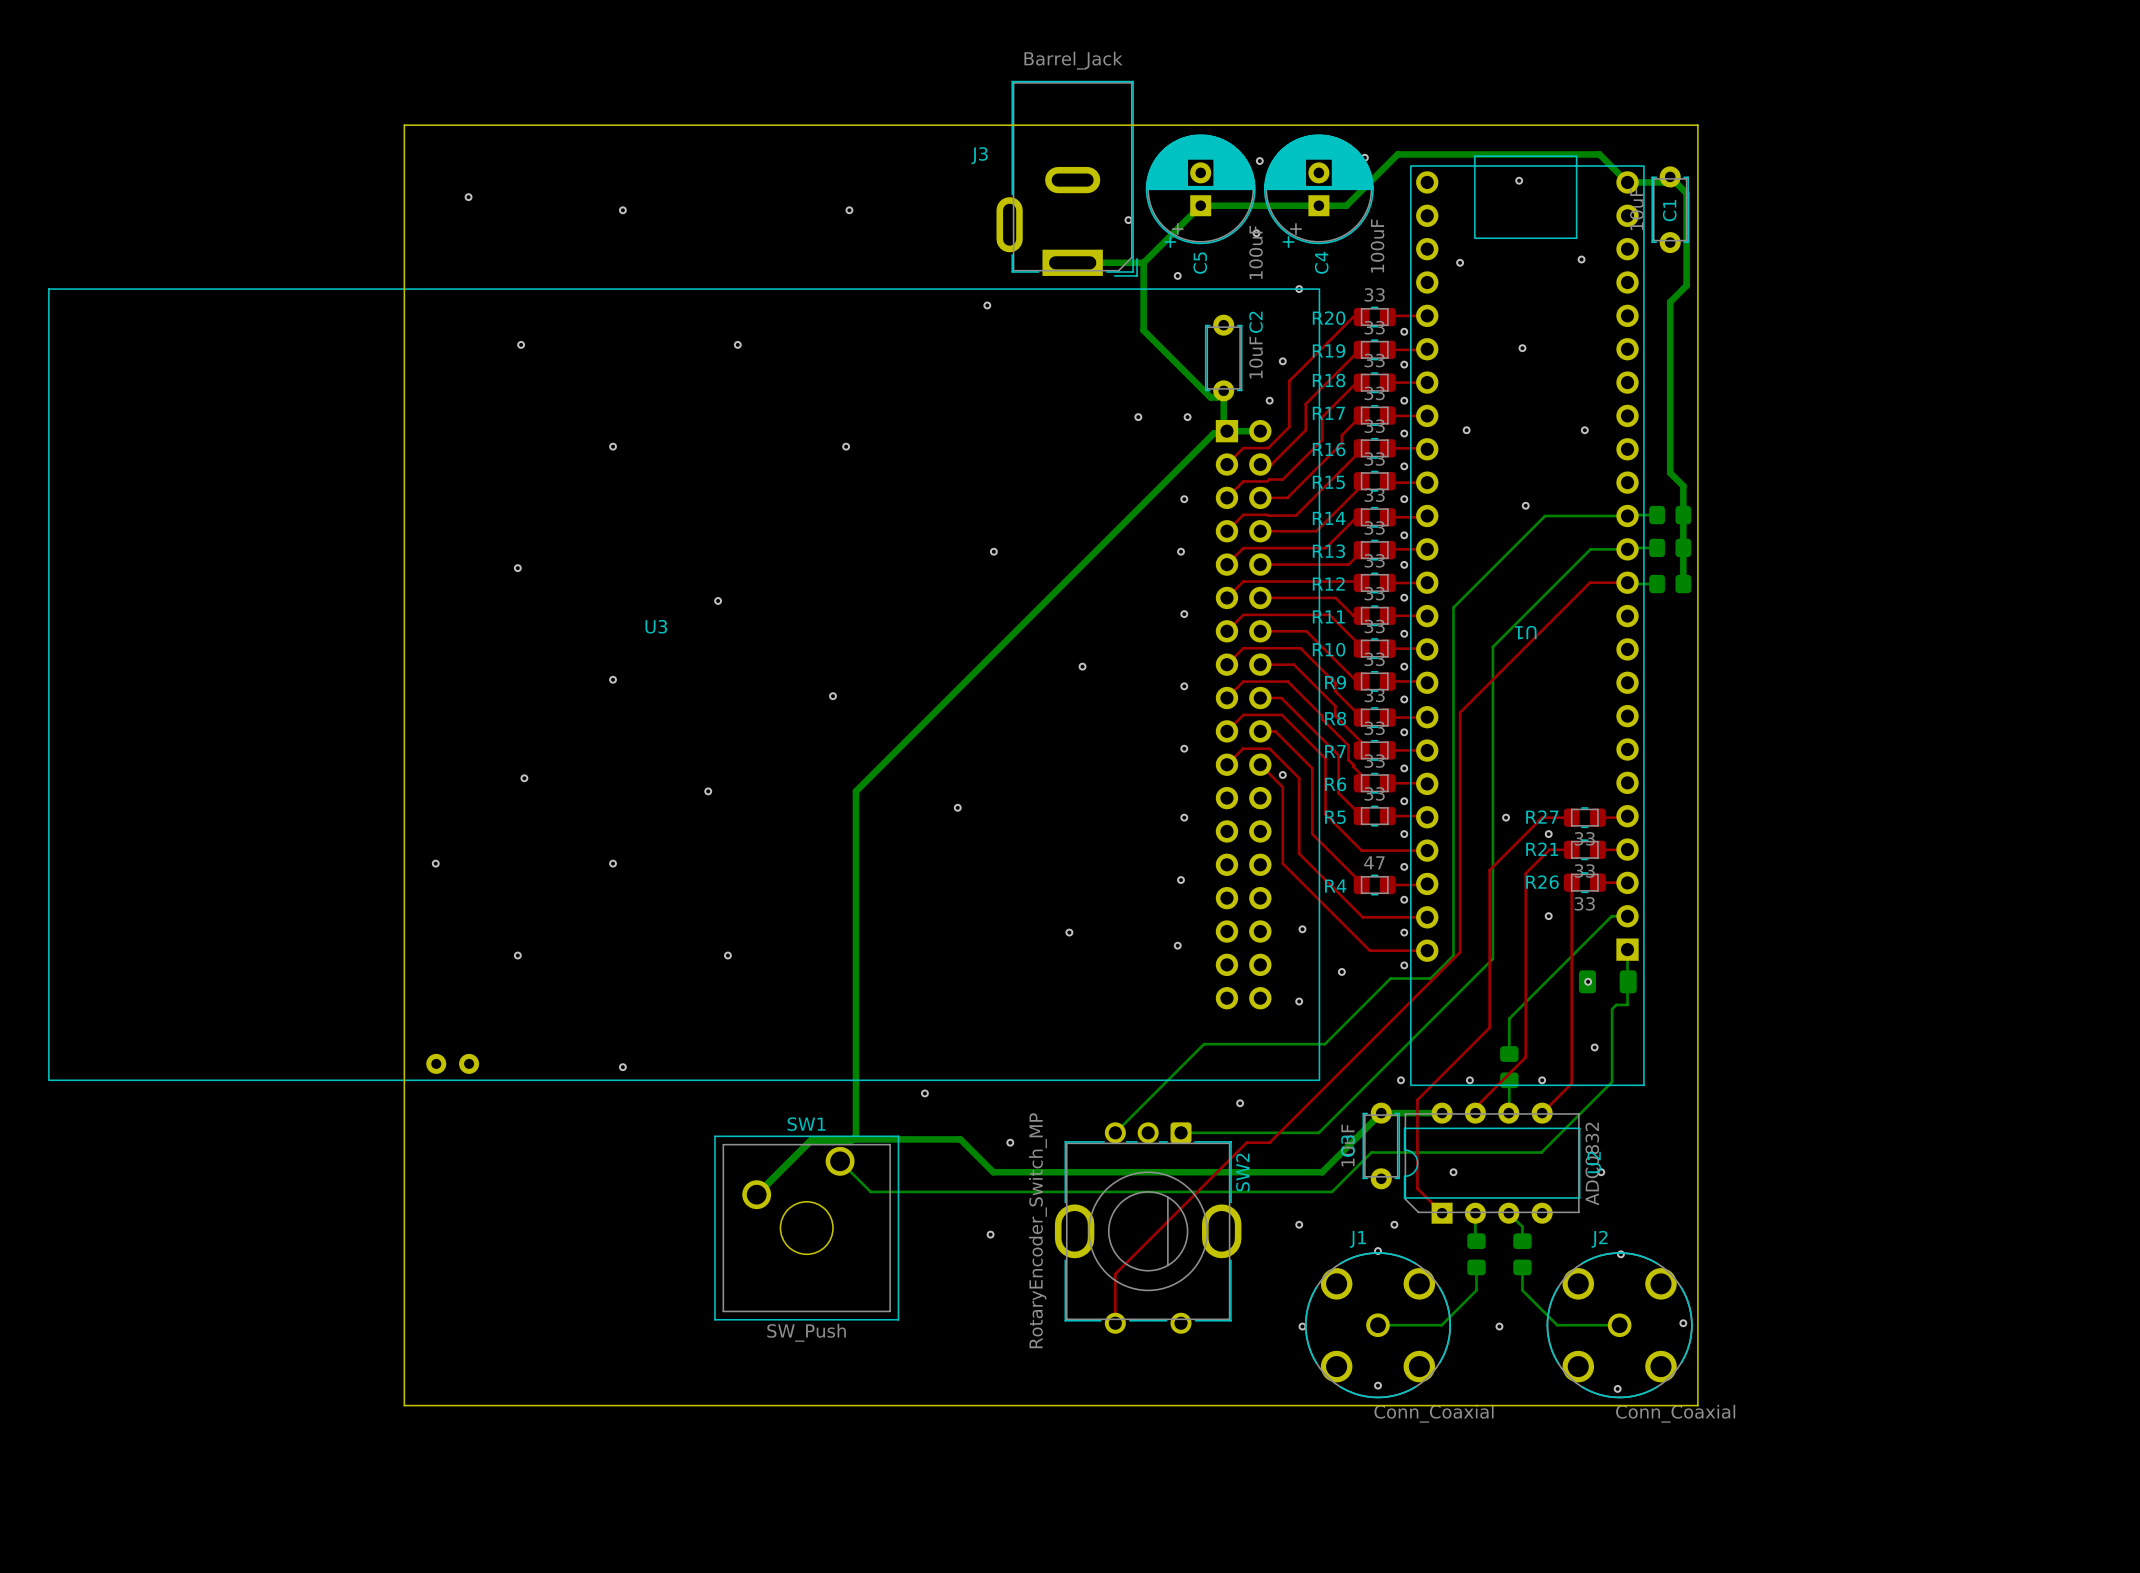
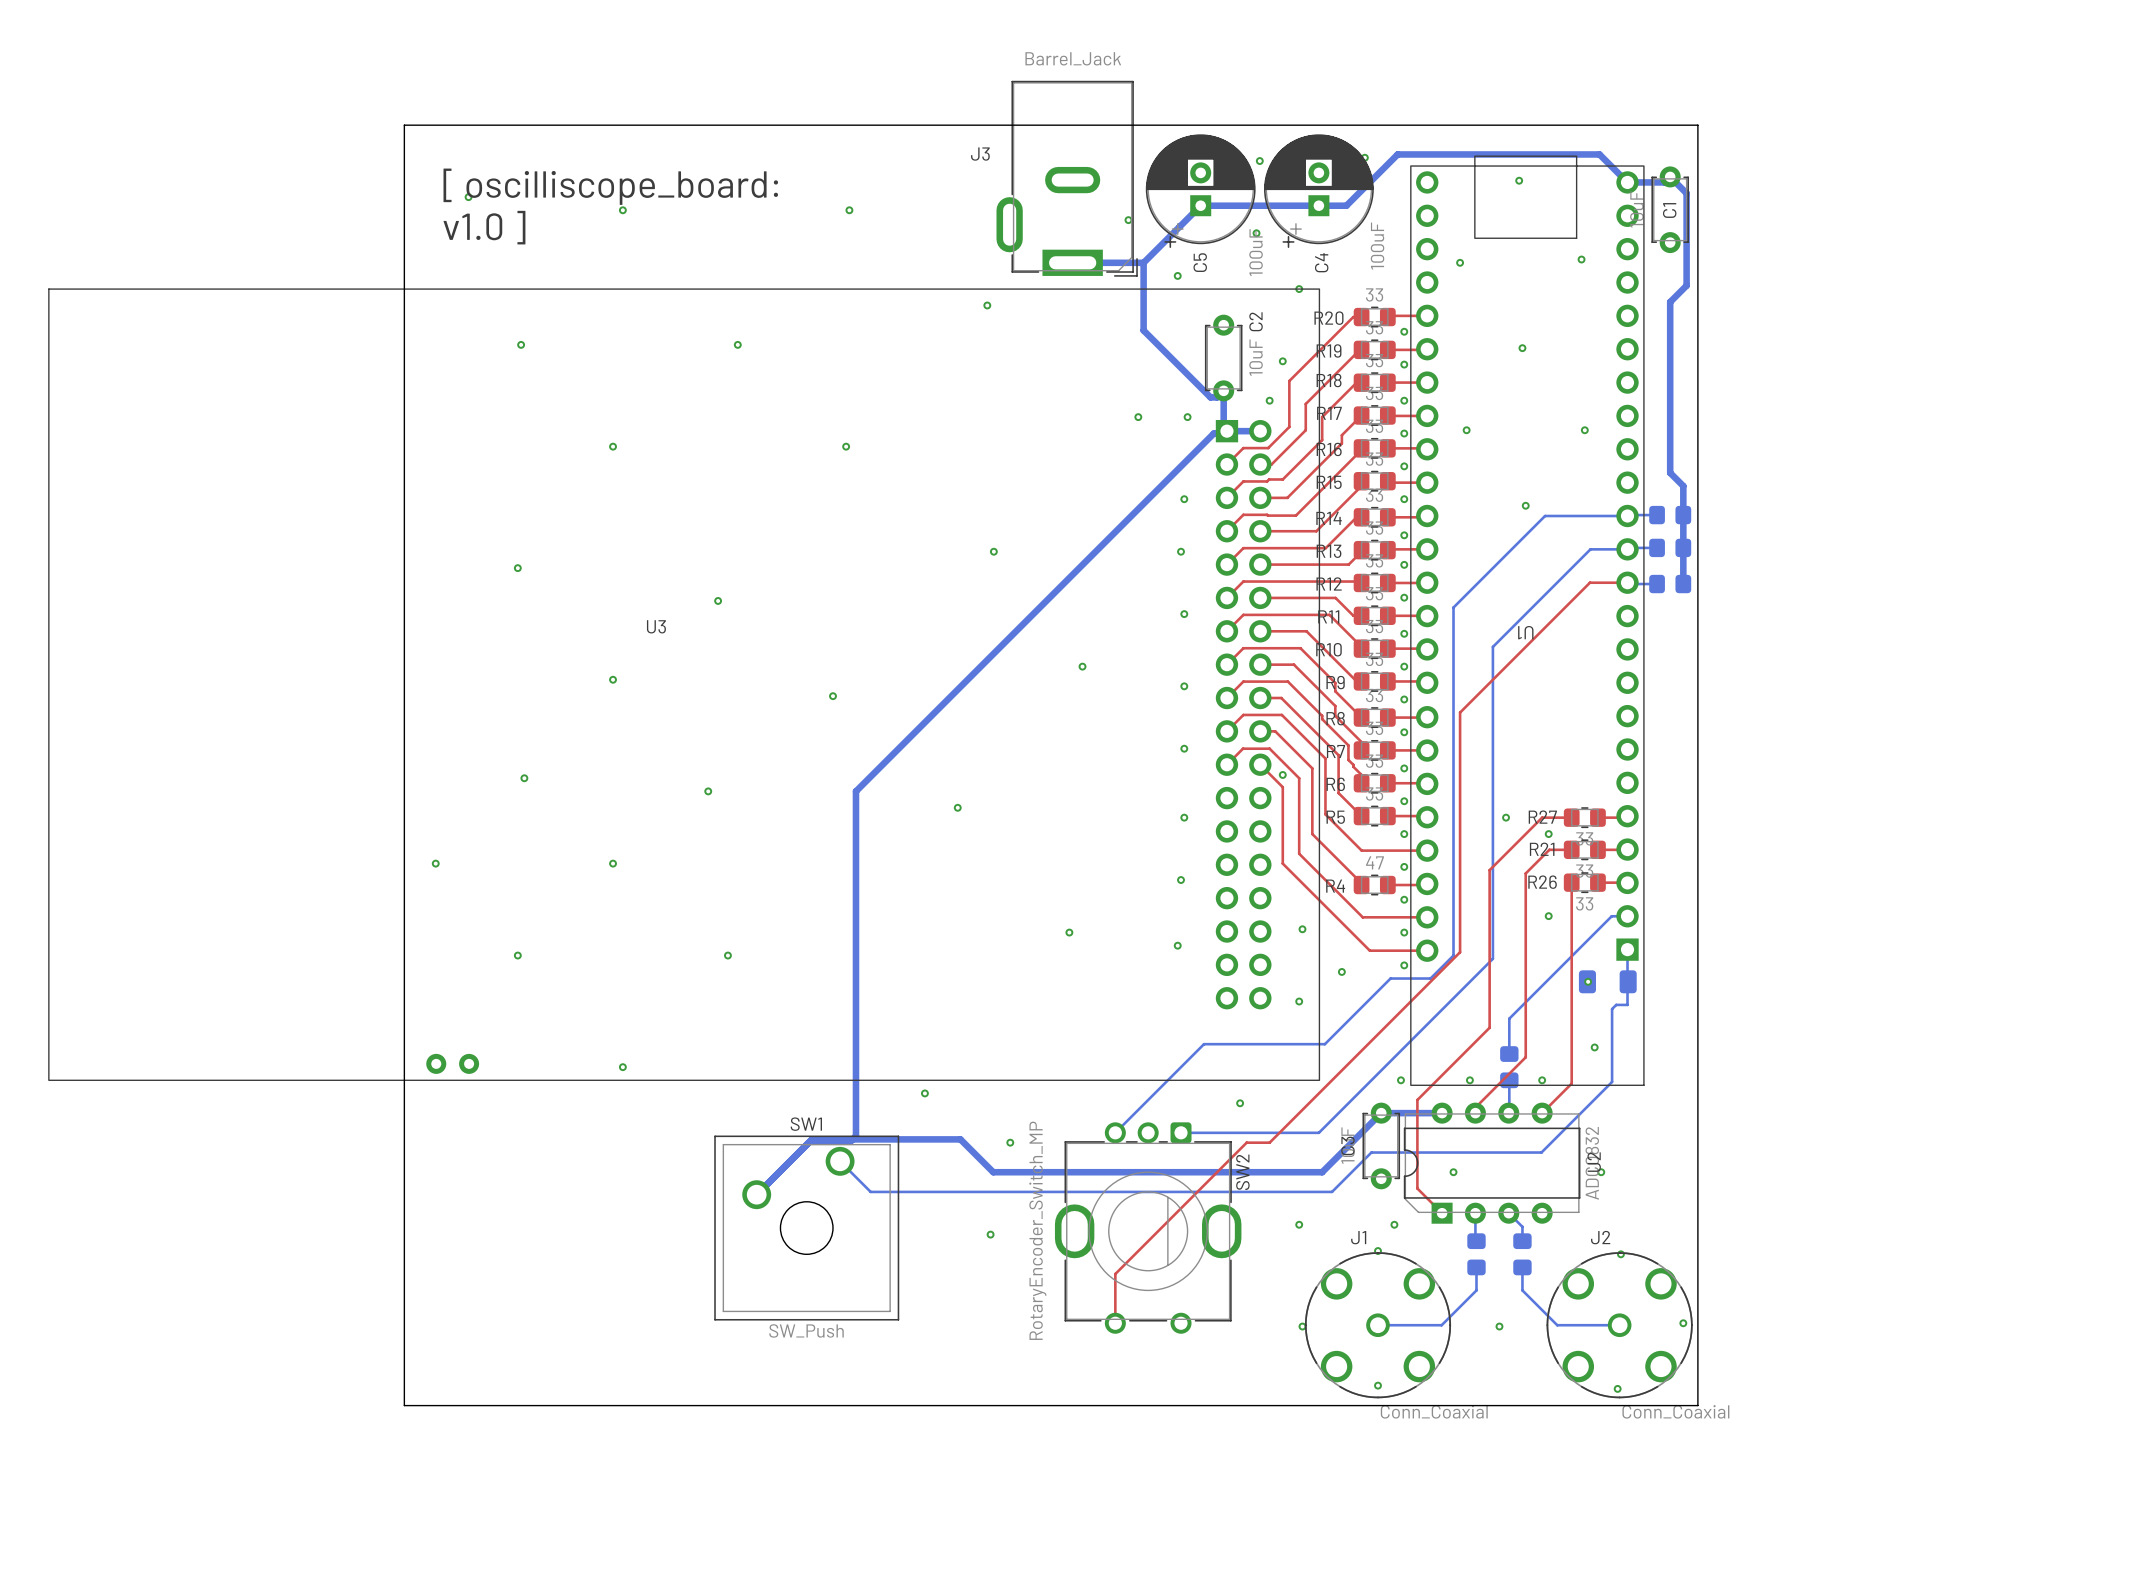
text: none -> [ oscilliscope_board: (610, 186)
text: none -> v1.0 ] (484, 227)

